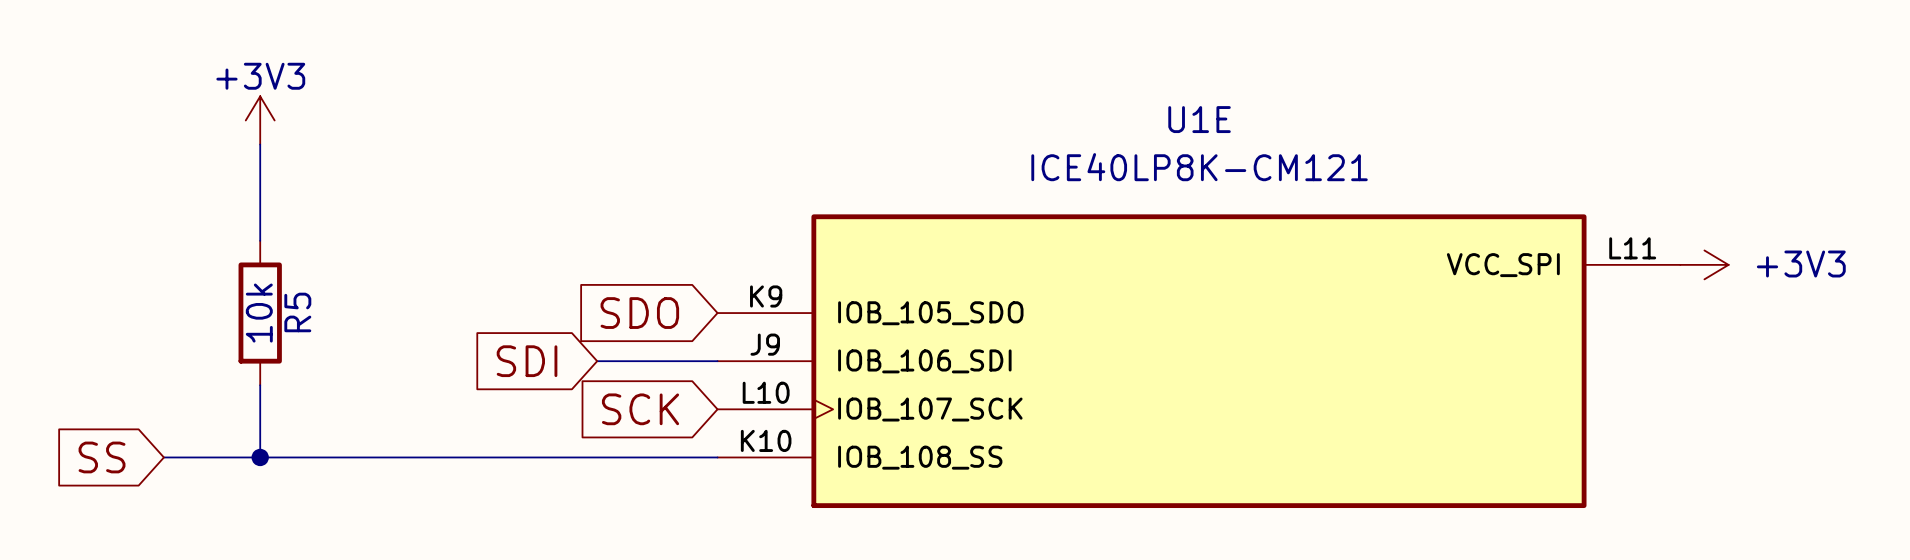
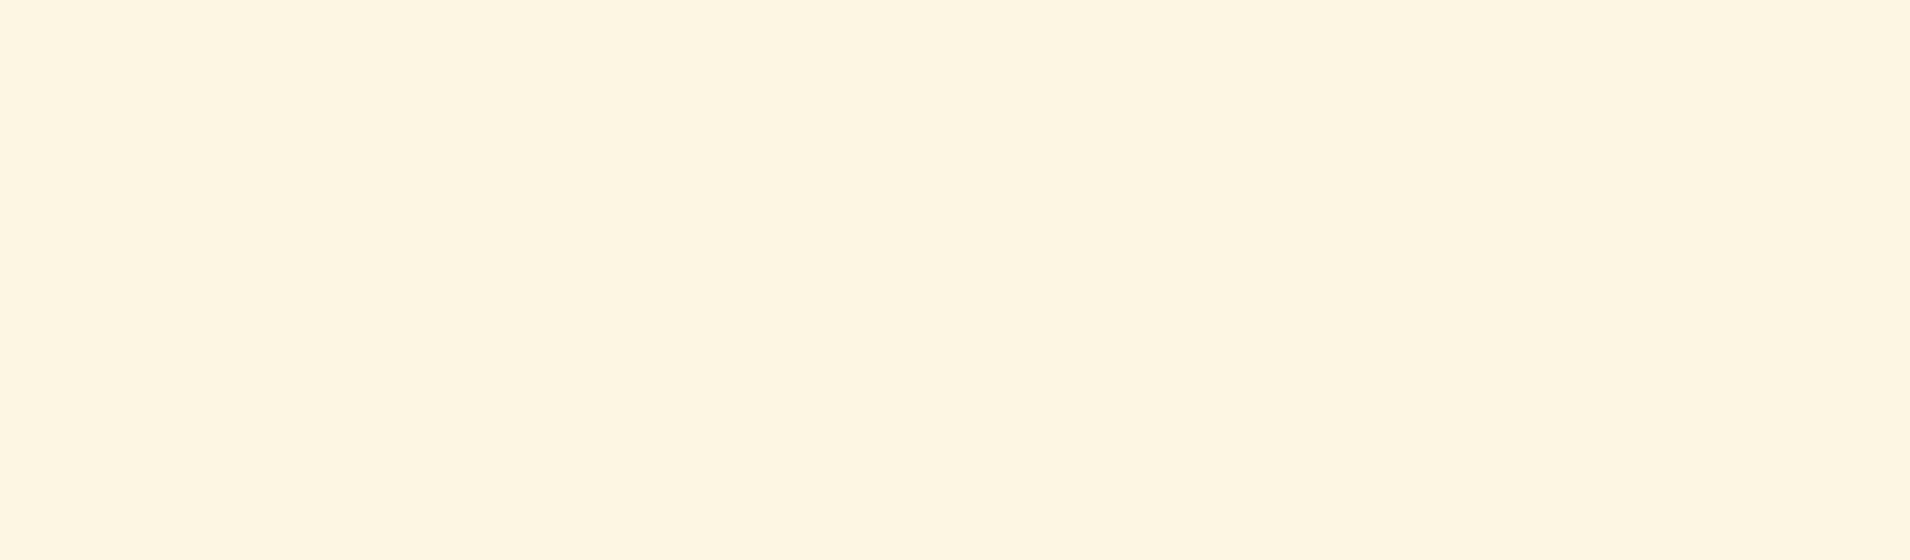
power symbol: +3V3 (260, 120) -> none
wire: (260, 144) (260, 240) -> none
power symbol: +3V3 (1704, 264) -> none
R5: 10k (260, 313) -> none
global label: SDO (639, 313) -> none
global label: SDI (527, 361) -> none
wire: (597, 361) (717, 361) -> none
U1E: ICE40LP8K-CM121 (1198, 361) -> none
wire: (260, 385) (260, 457) -> none
global label: SCK (640, 409) -> none
global label: SS (102, 457) -> none
wire: (163, 457) (717, 457) -> none
junction: (260, 457) -> none

